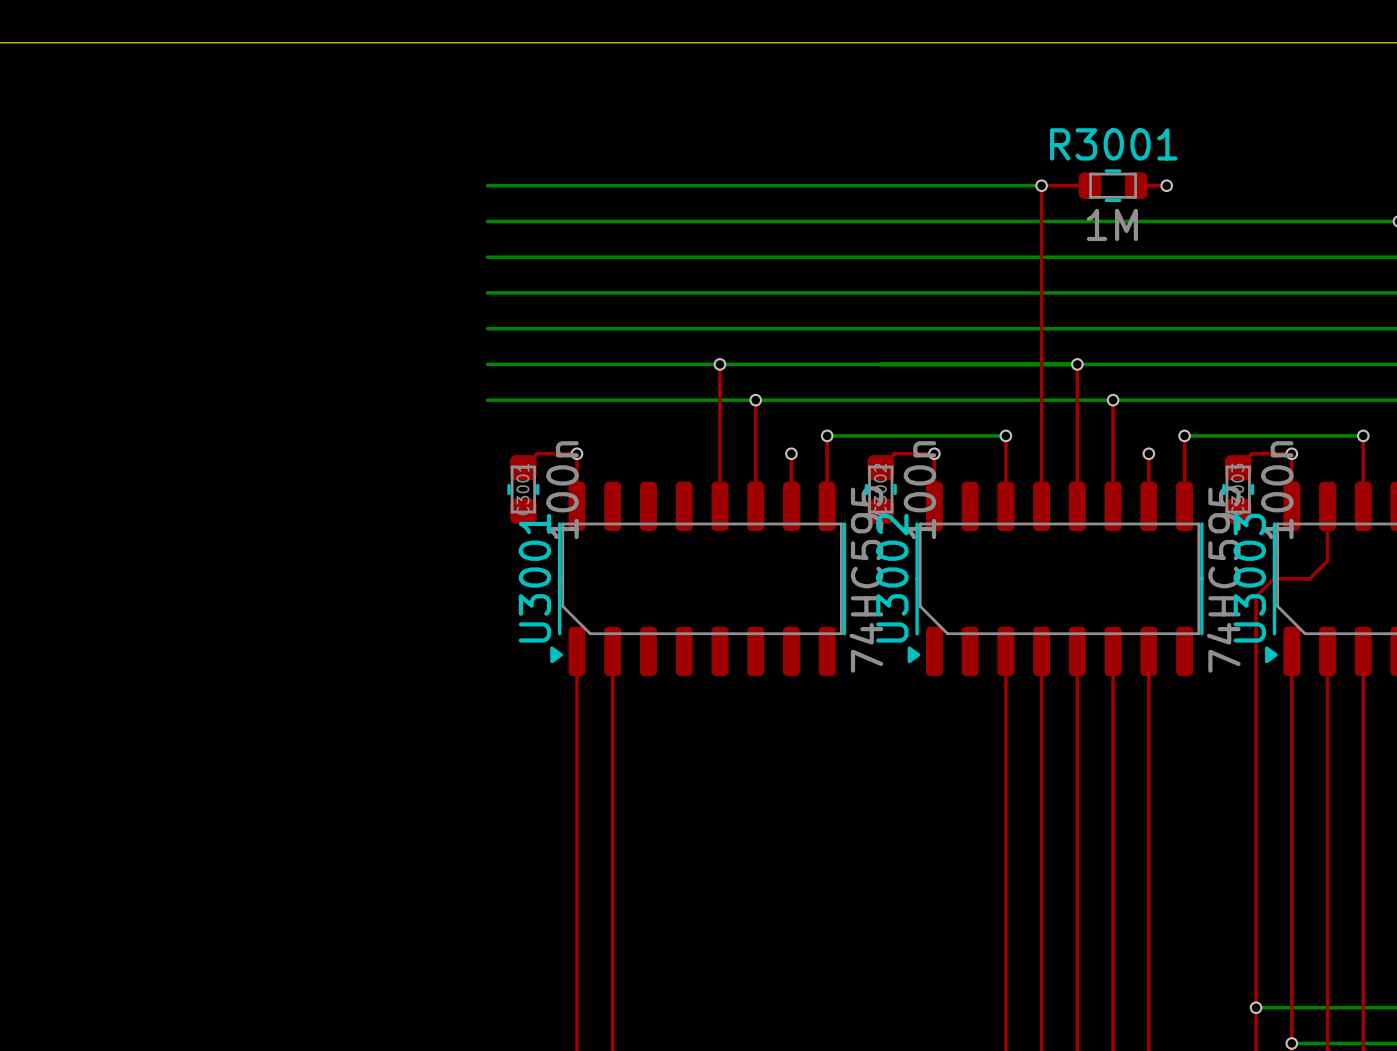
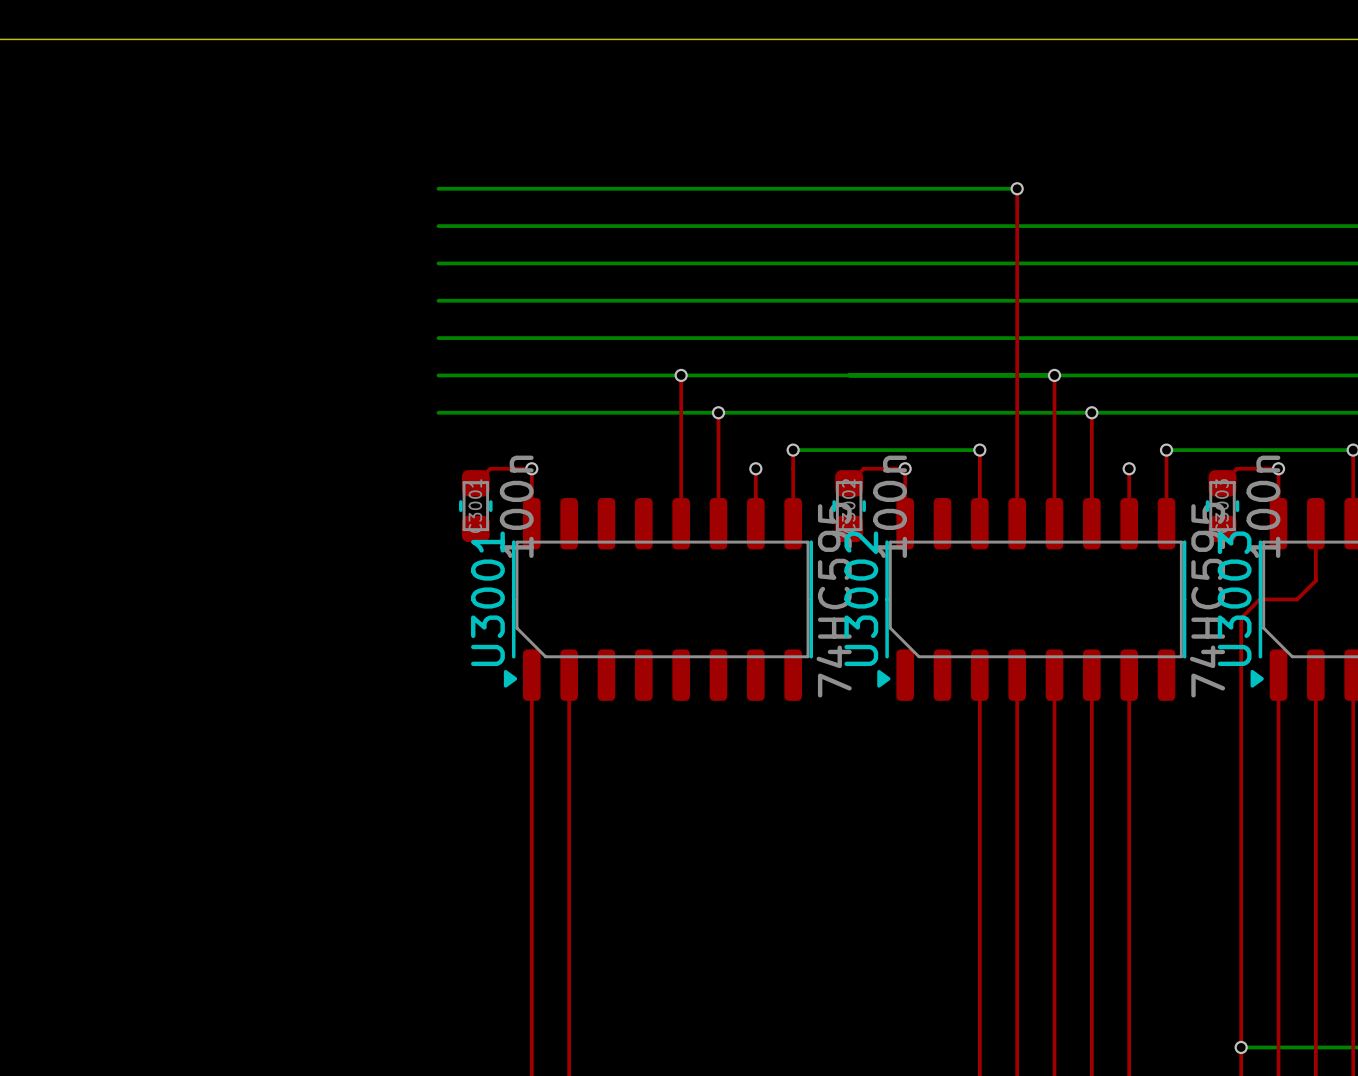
top track: (1041, 185) (1089, 185) -> none
R3001: 1M (1113, 185) -> none
top track: (1136, 185) (1166, 185) -> none
via: (1166, 185) -> none

